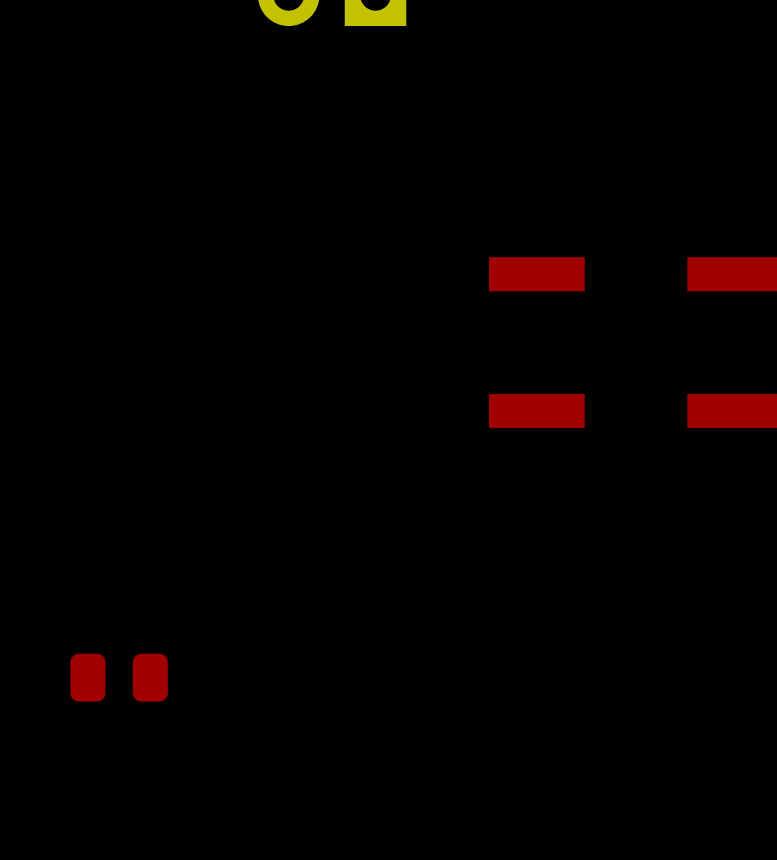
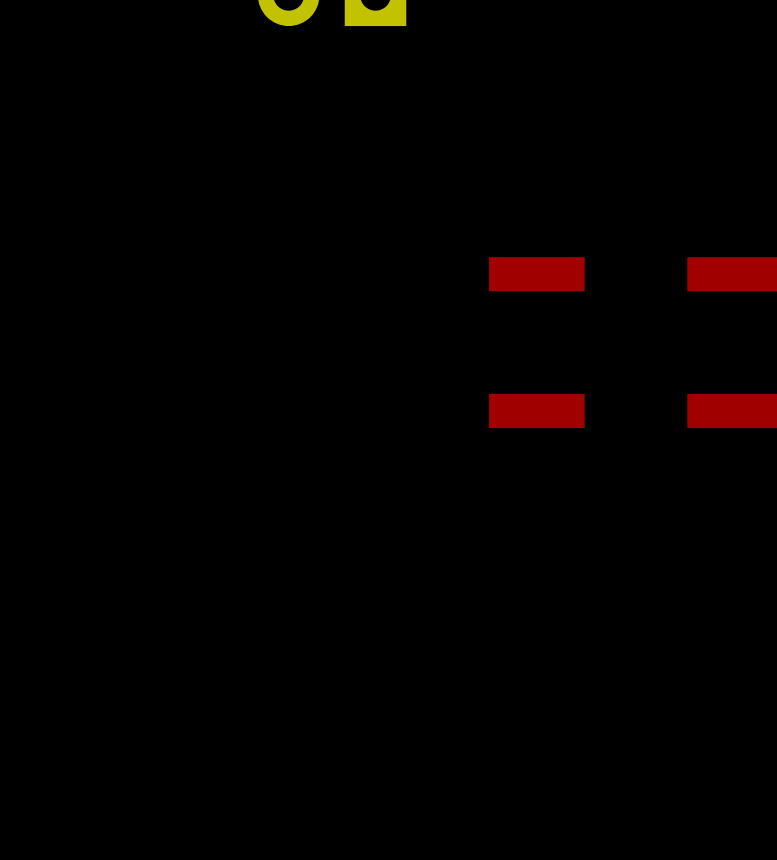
part: (119, 677) -> none

